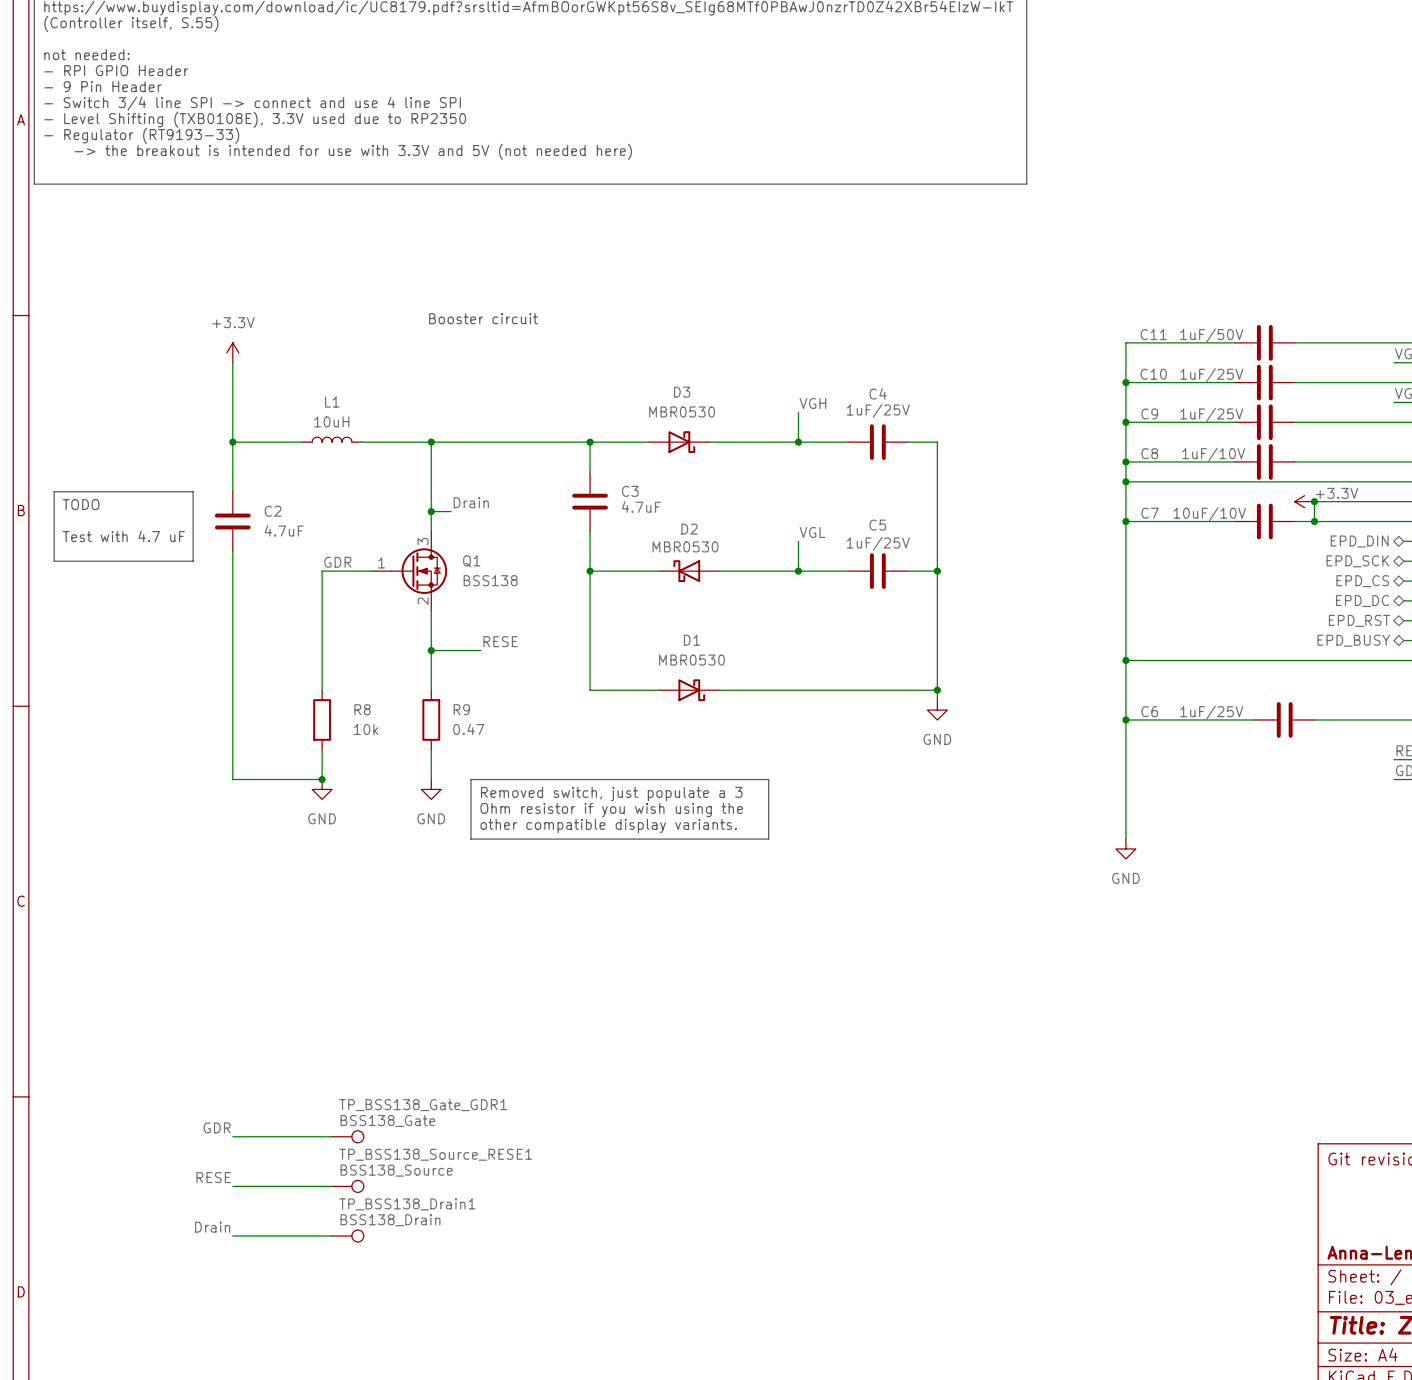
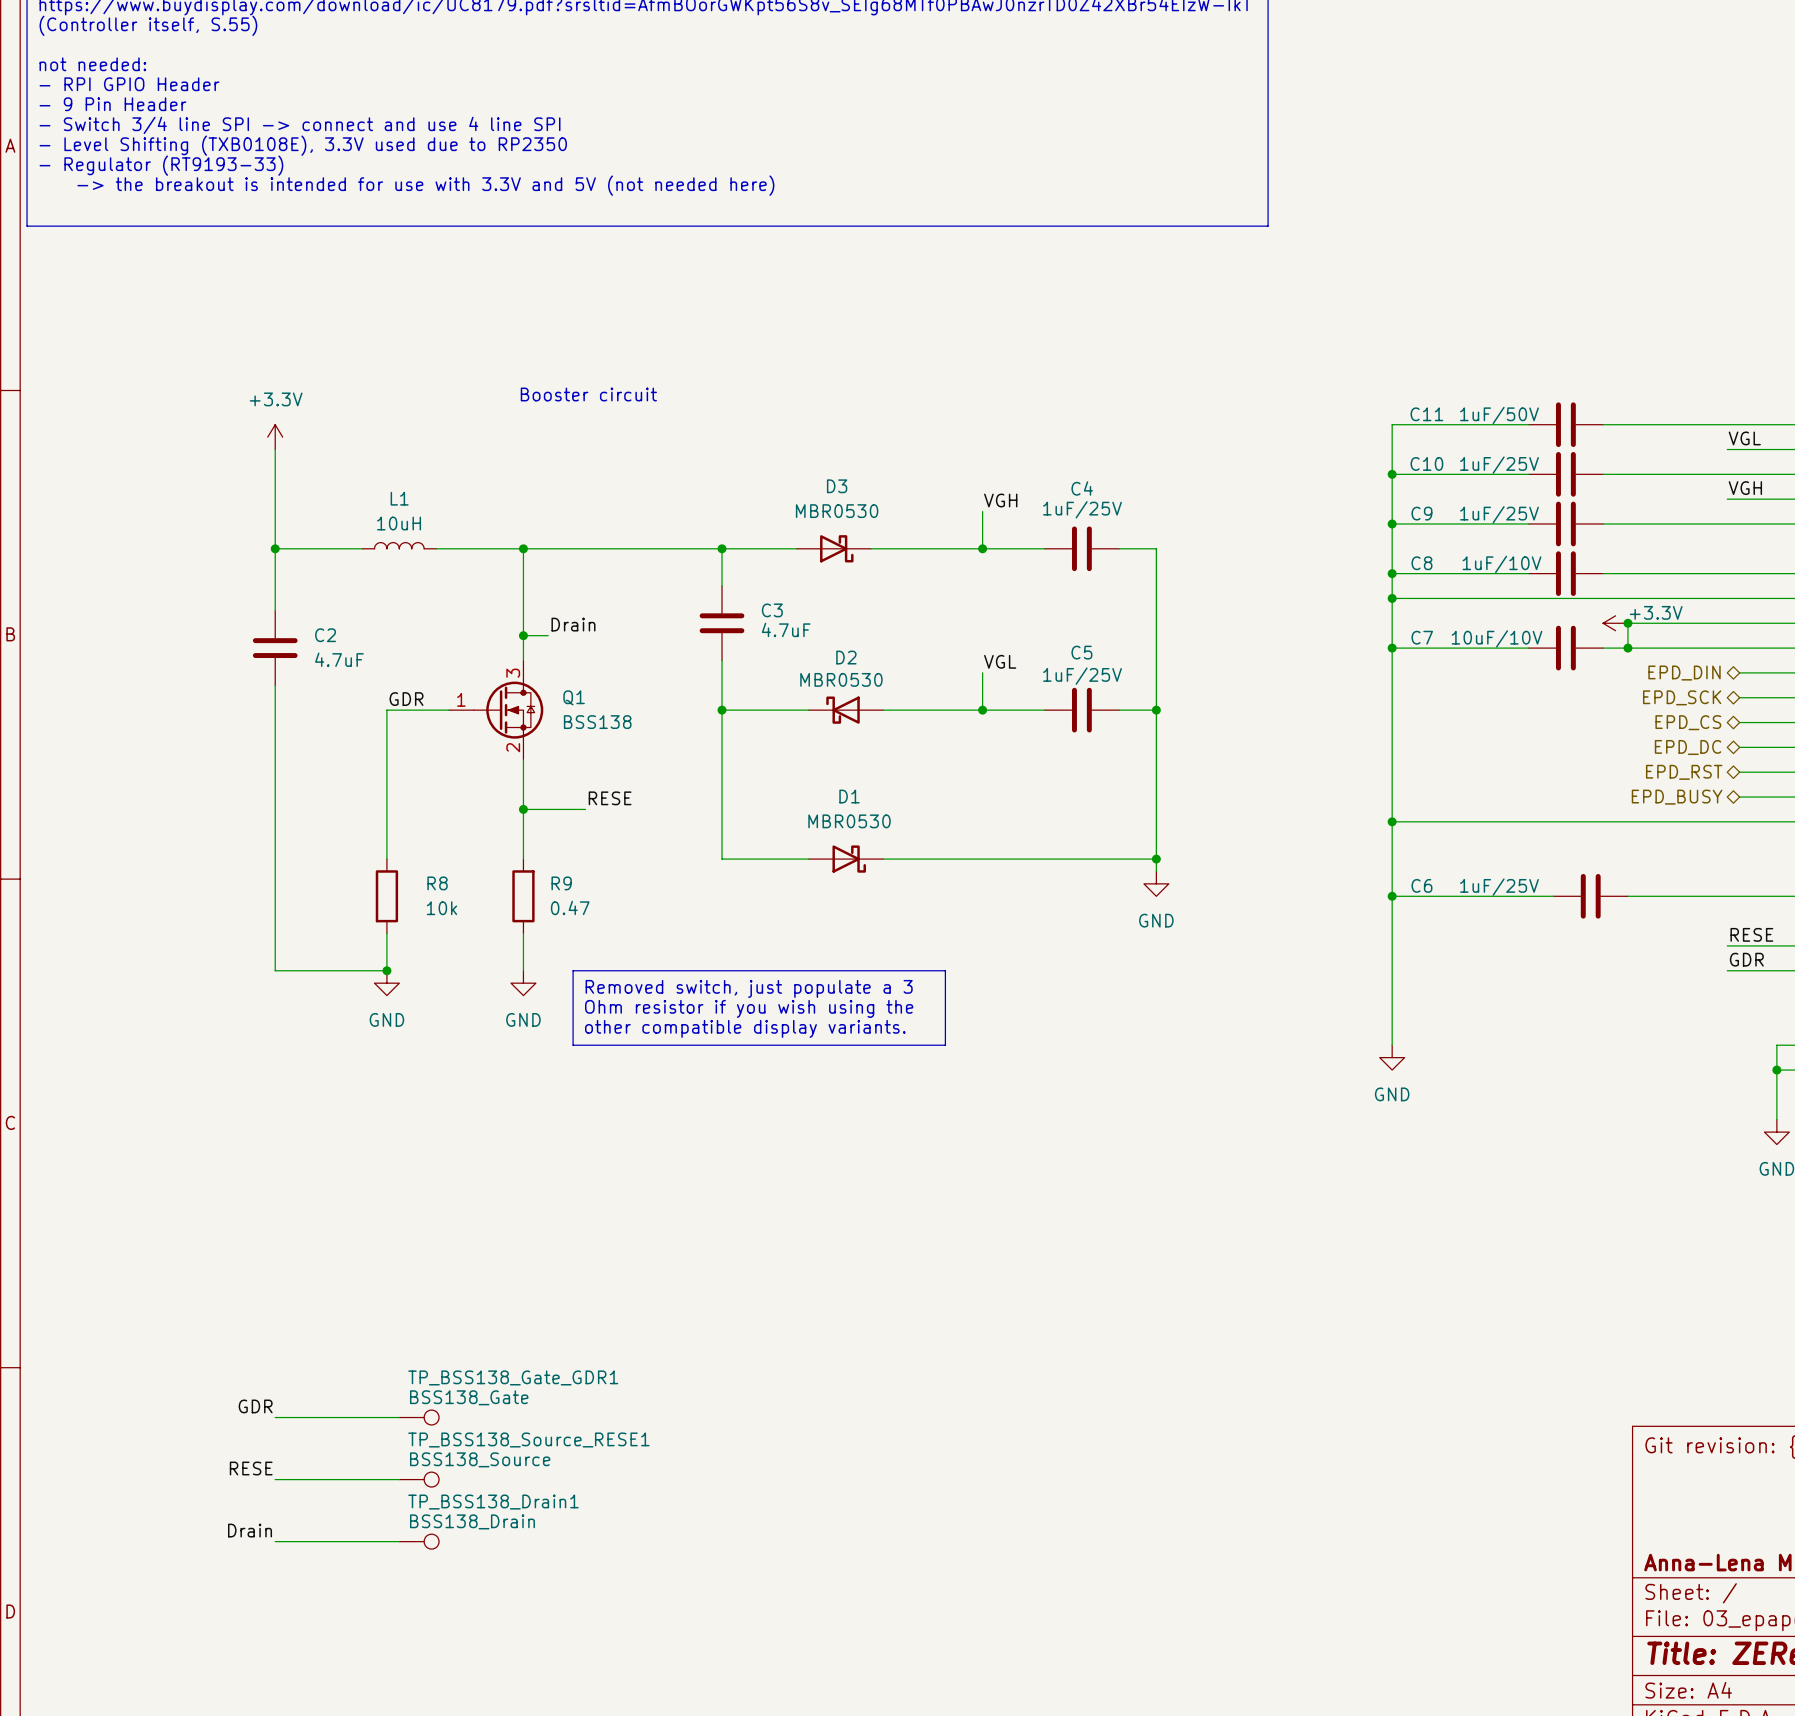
line: (54, 491) (193, 491) (193, 561) (54, 561) (54, 491) -> none
text: TODO (81, 504) -> none
text: Test with 4.7 uF (123, 536) -> none

